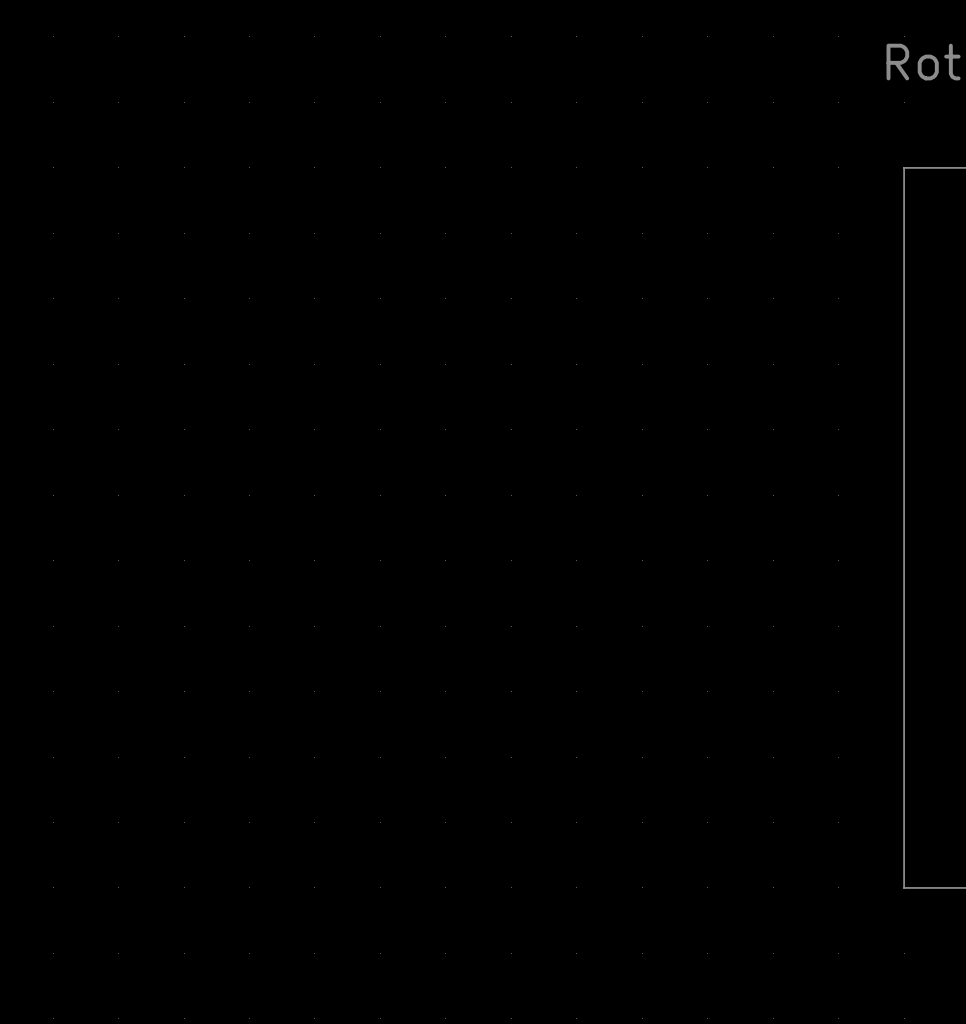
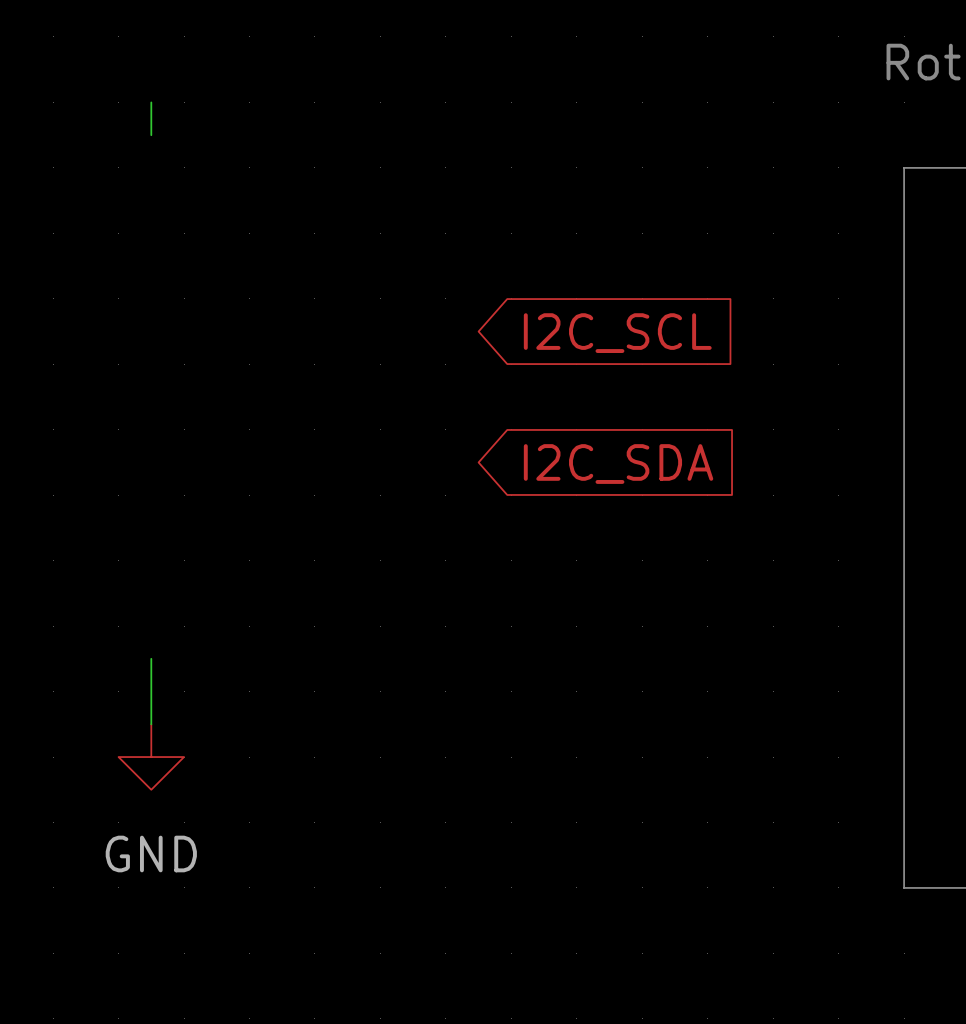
wire: none -> (151, 102) (151, 135)
global label: none -> I2C_SCL (617, 333)
global label: none -> I2C_SDA (618, 464)
wire: none -> (151, 658) (151, 724)
power symbol: none -> GND (151, 757)

